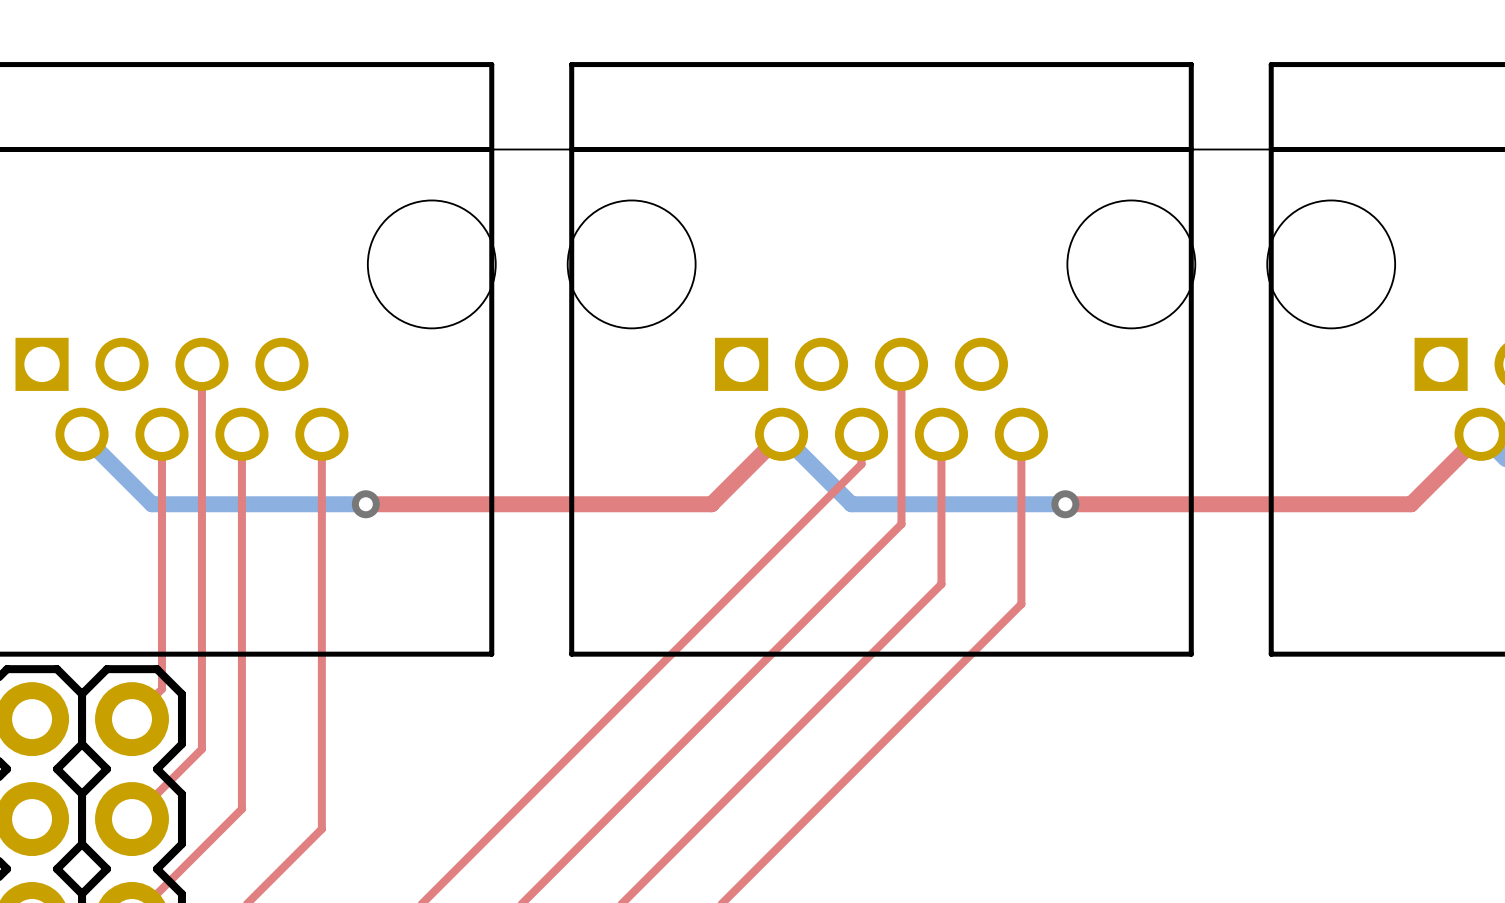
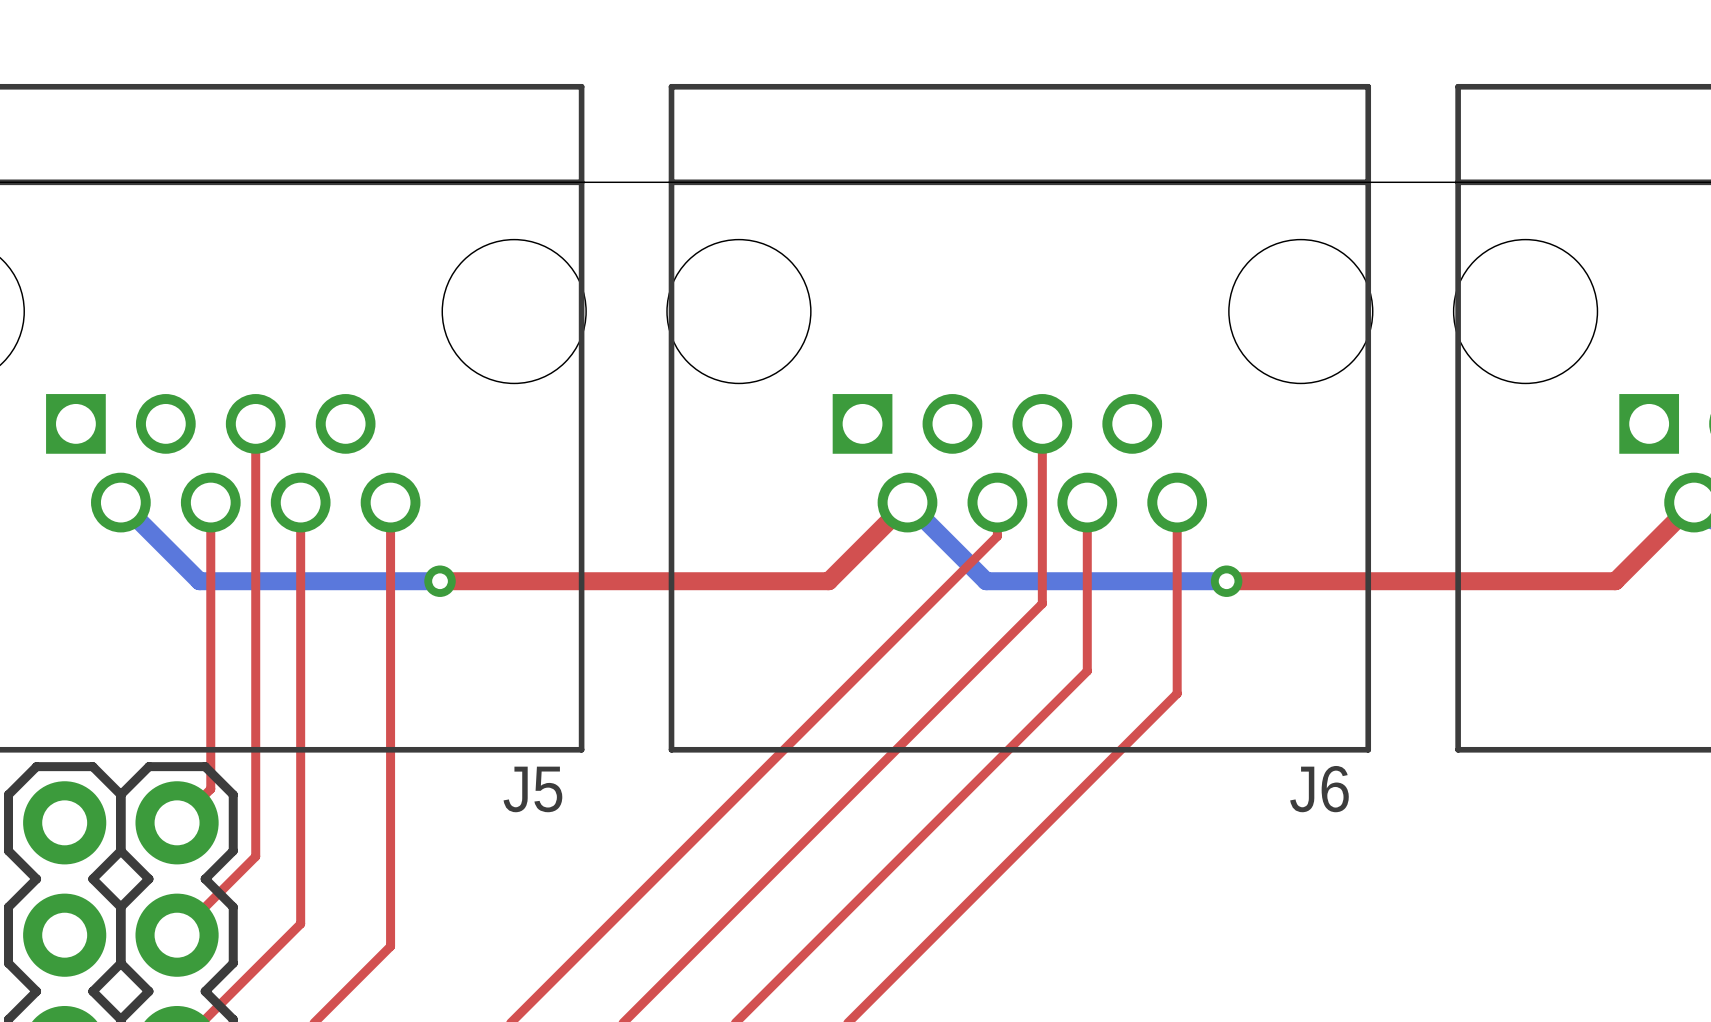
J5 name: none -> J5 (532, 789)
J6 name: none -> J6 (1319, 789)

